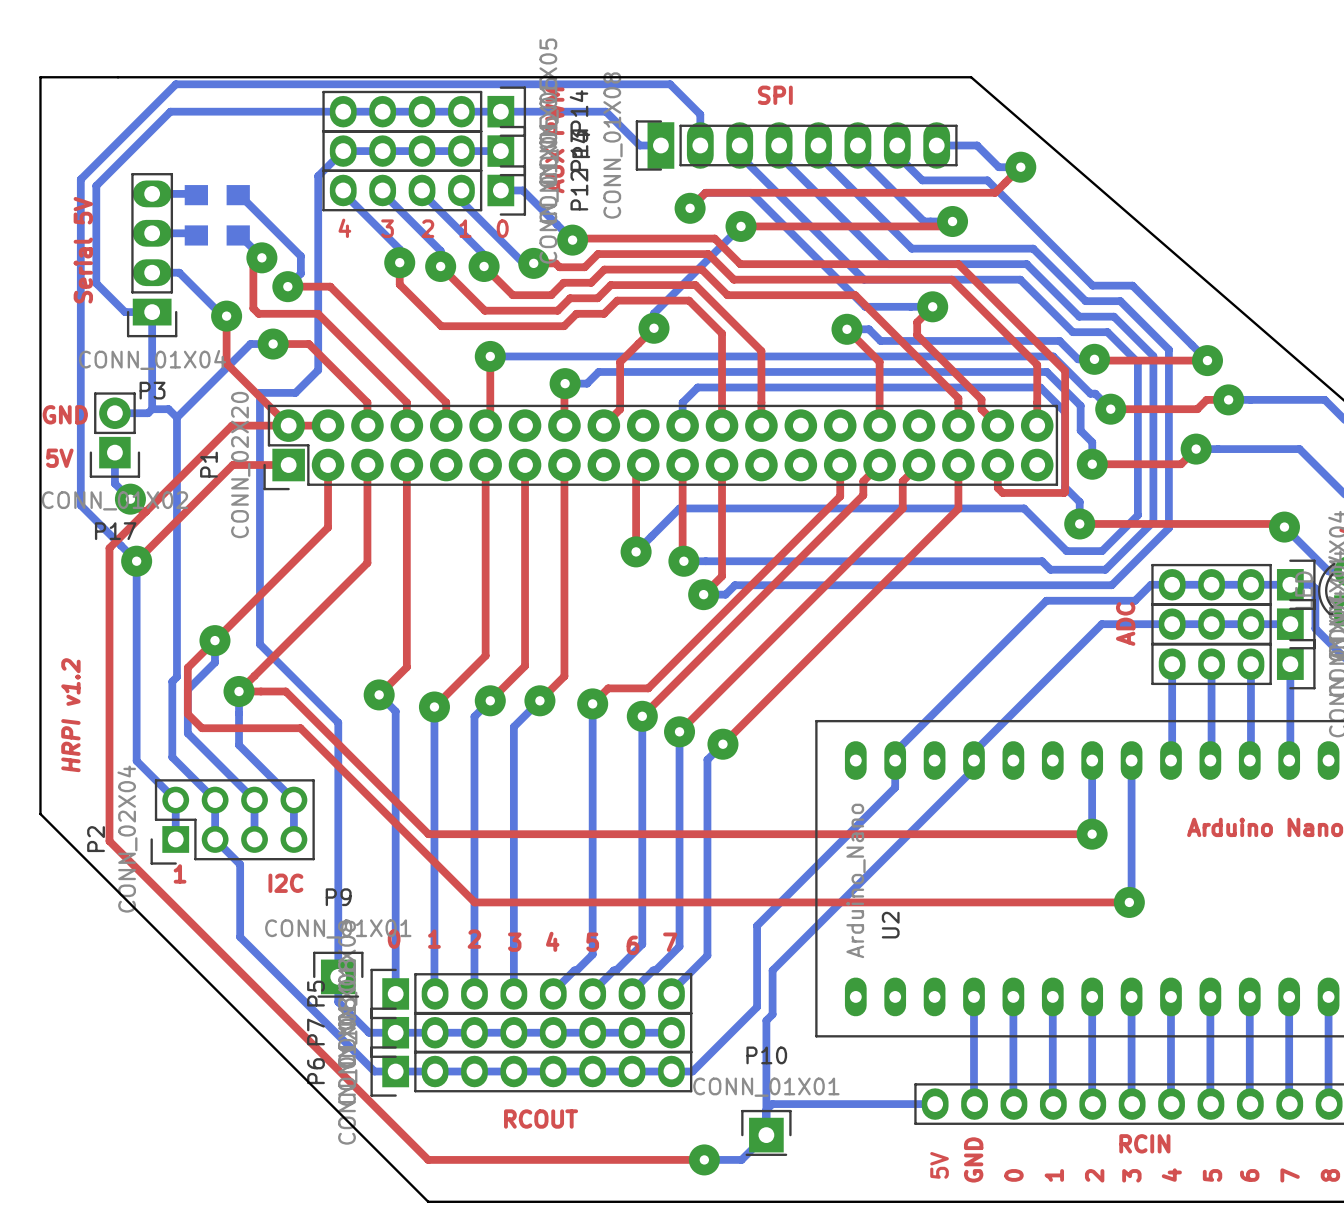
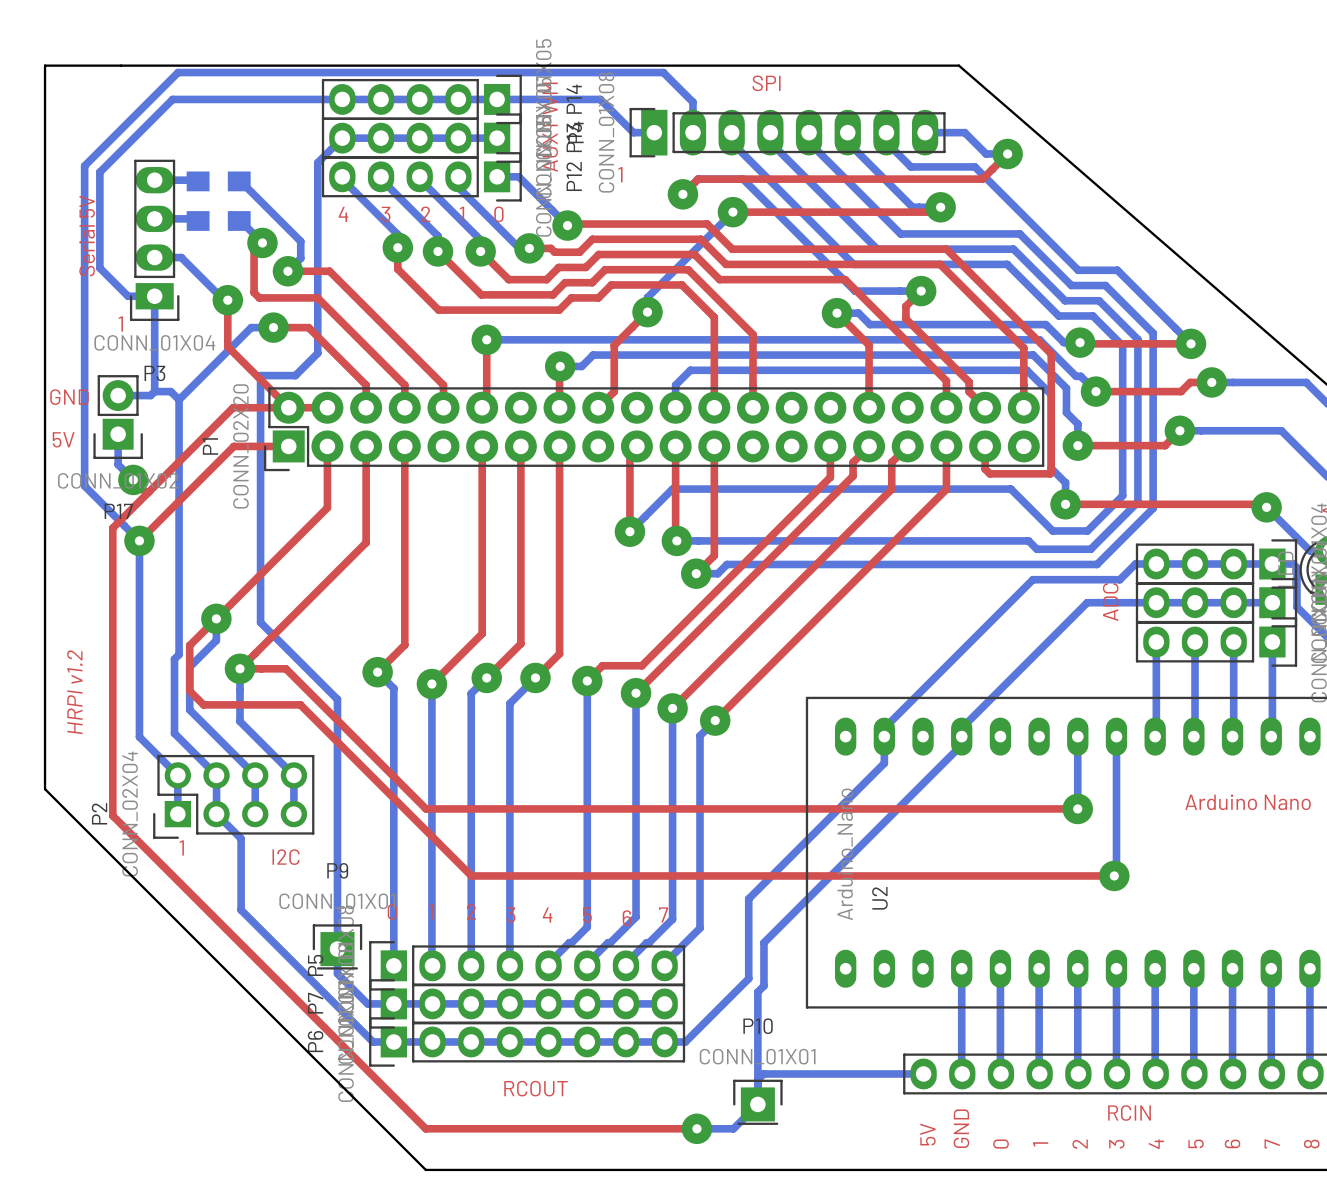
text: none -> 1 (620, 174)
text: none -> 1 (120, 324)

